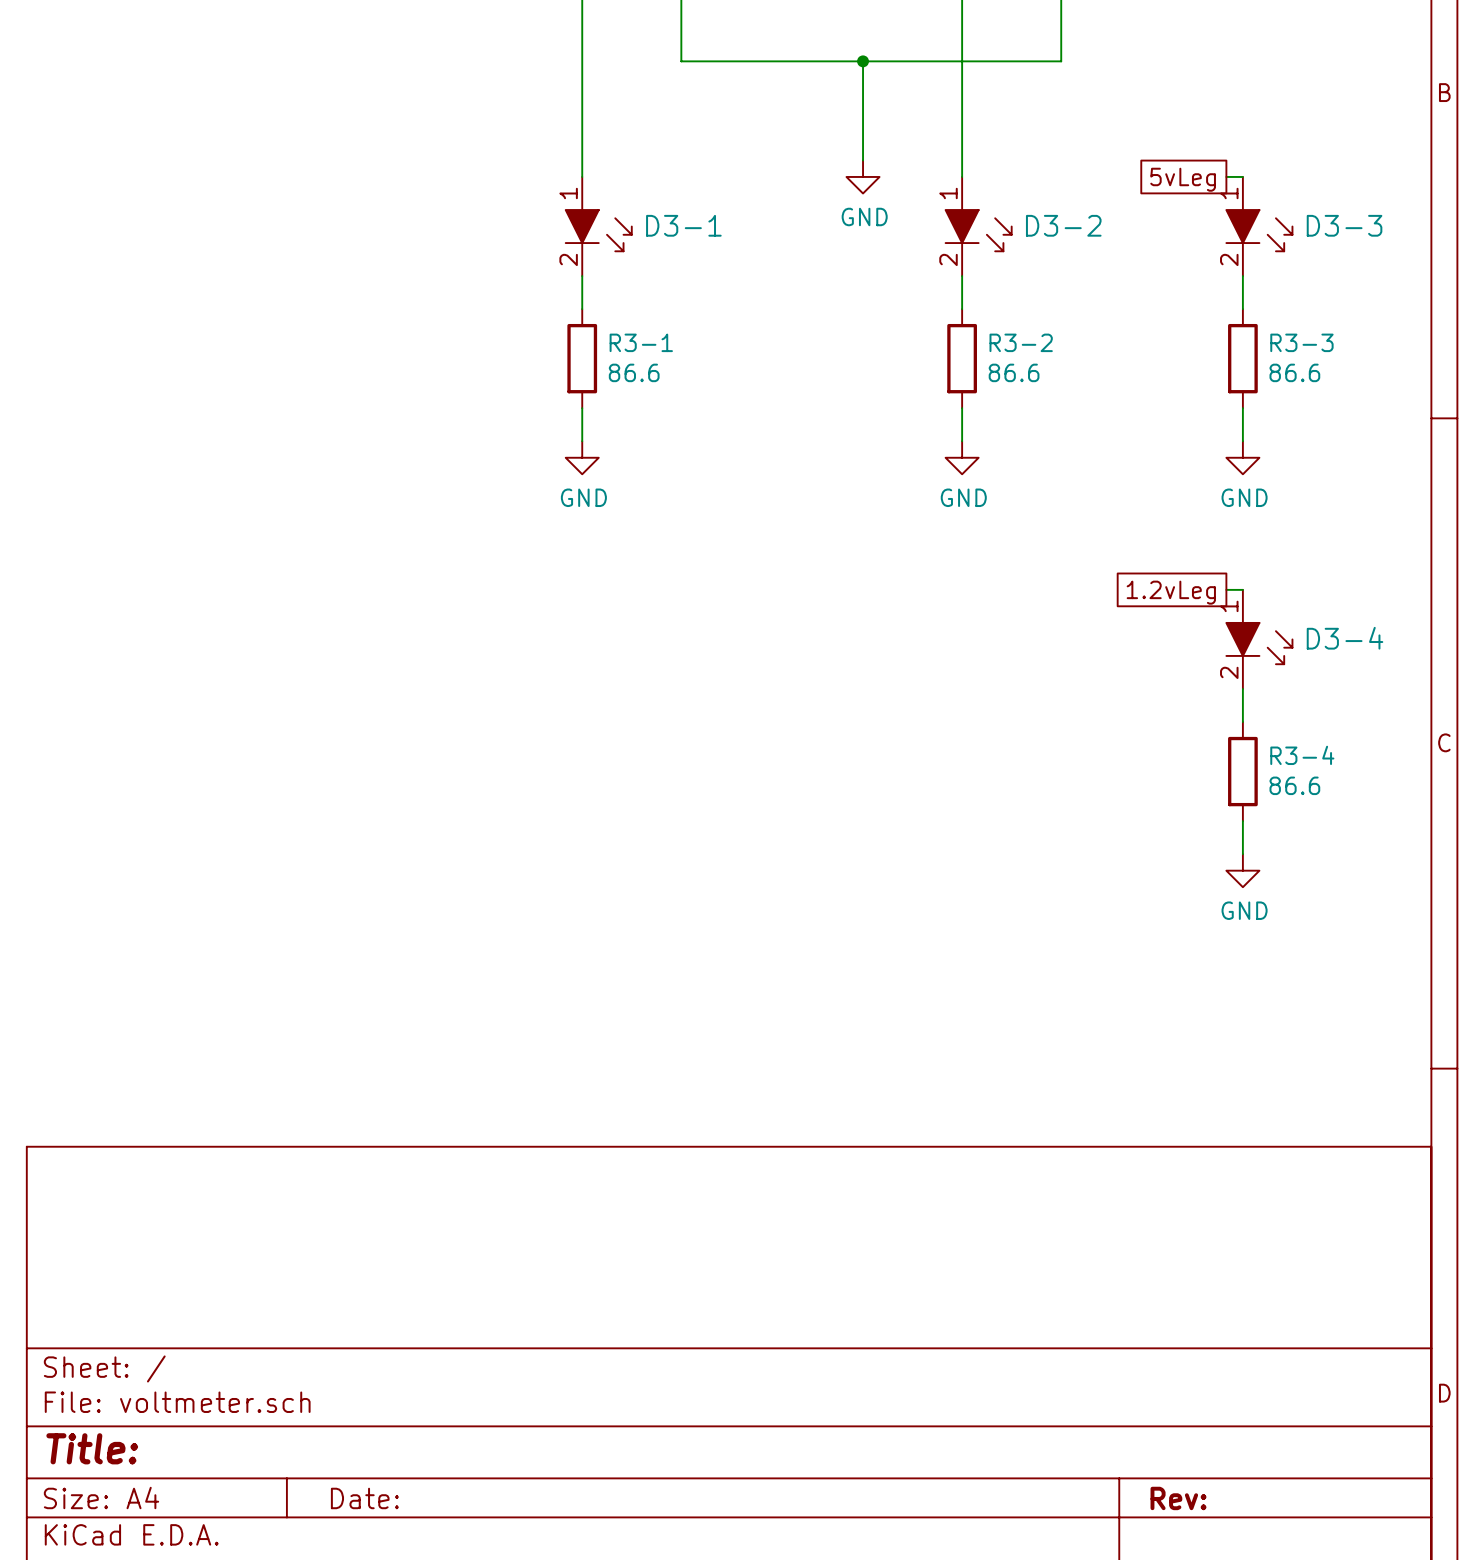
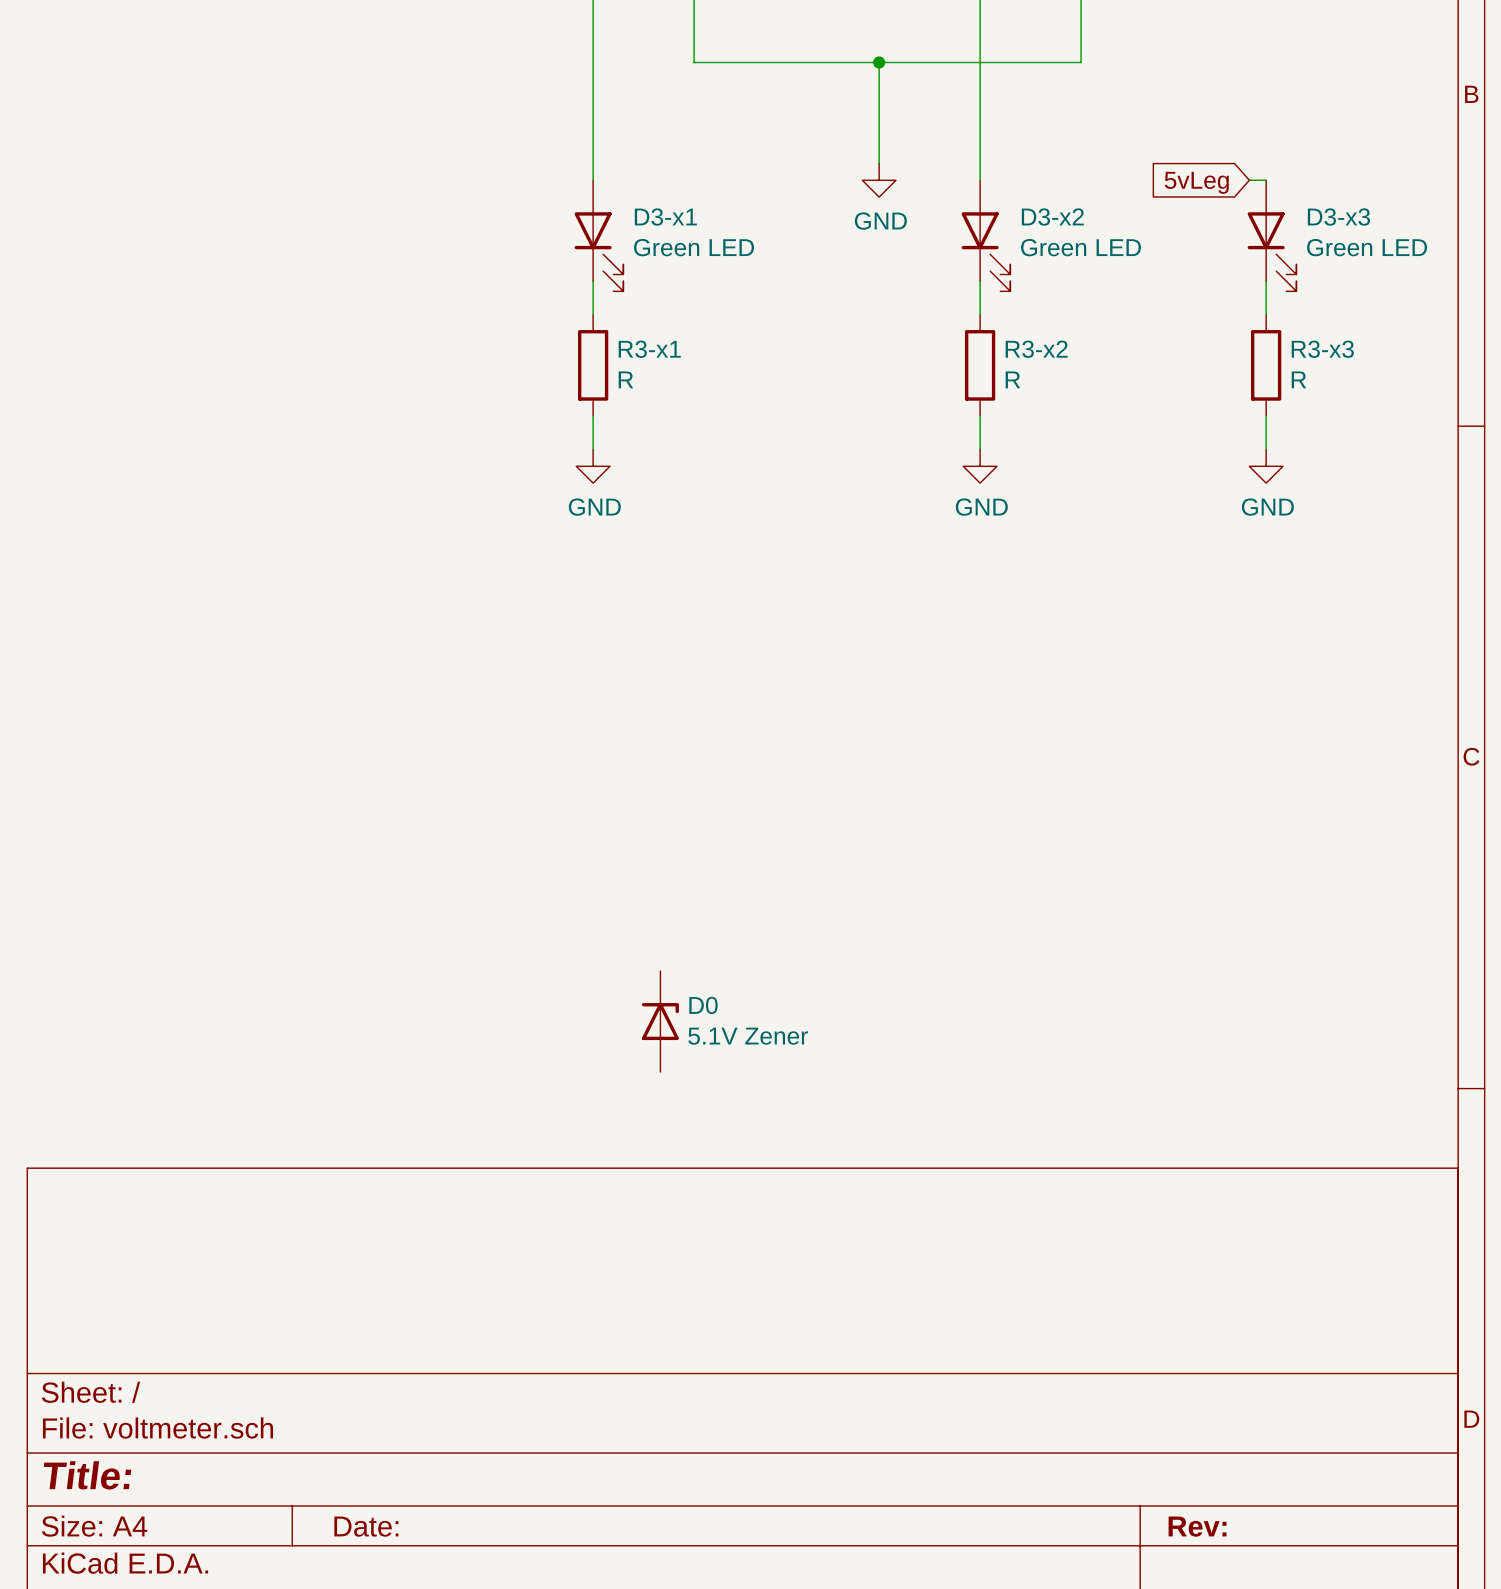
global label shape: passive (1183, 179) -> input (1196, 182)
D3-1: (598, 226) -> none
D3-2: (978, 226) -> none
D3-3: (1259, 226) -> none
D3-x1: none -> Green LED (599, 235)
D3-x2: none -> Green LED (986, 235)
D3-x3: none -> Green LED (1272, 235)
R3-1 name: R3-1 (641, 342) -> R3-x1 (649, 349)
R3-2 name: R3-2 (1021, 342) -> R3-x2 (1036, 349)
R3-3 name: R3-3 (1301, 342) -> R3-x3 (1322, 349)
R3-1 value: 86.6 (634, 372) -> R (625, 379)
R3-2 value: 86.6 (1014, 372) -> R (1012, 379)
R3-3 value: 86.6 (1294, 372) -> R (1298, 379)
wire: (1226, 589) (1242, 589) -> none
global label: 1.2vLeg (1171, 592) -> none
D3-4: (1259, 639) -> none
wire: (1242, 688) (1242, 722) -> none
R3-4: 86.6 (1242, 771) -> none
wire: (1242, 821) (1242, 854) -> none
power symbol: GND (1242, 870) -> none
D0: none -> 5.1V Zener (660, 1021)

